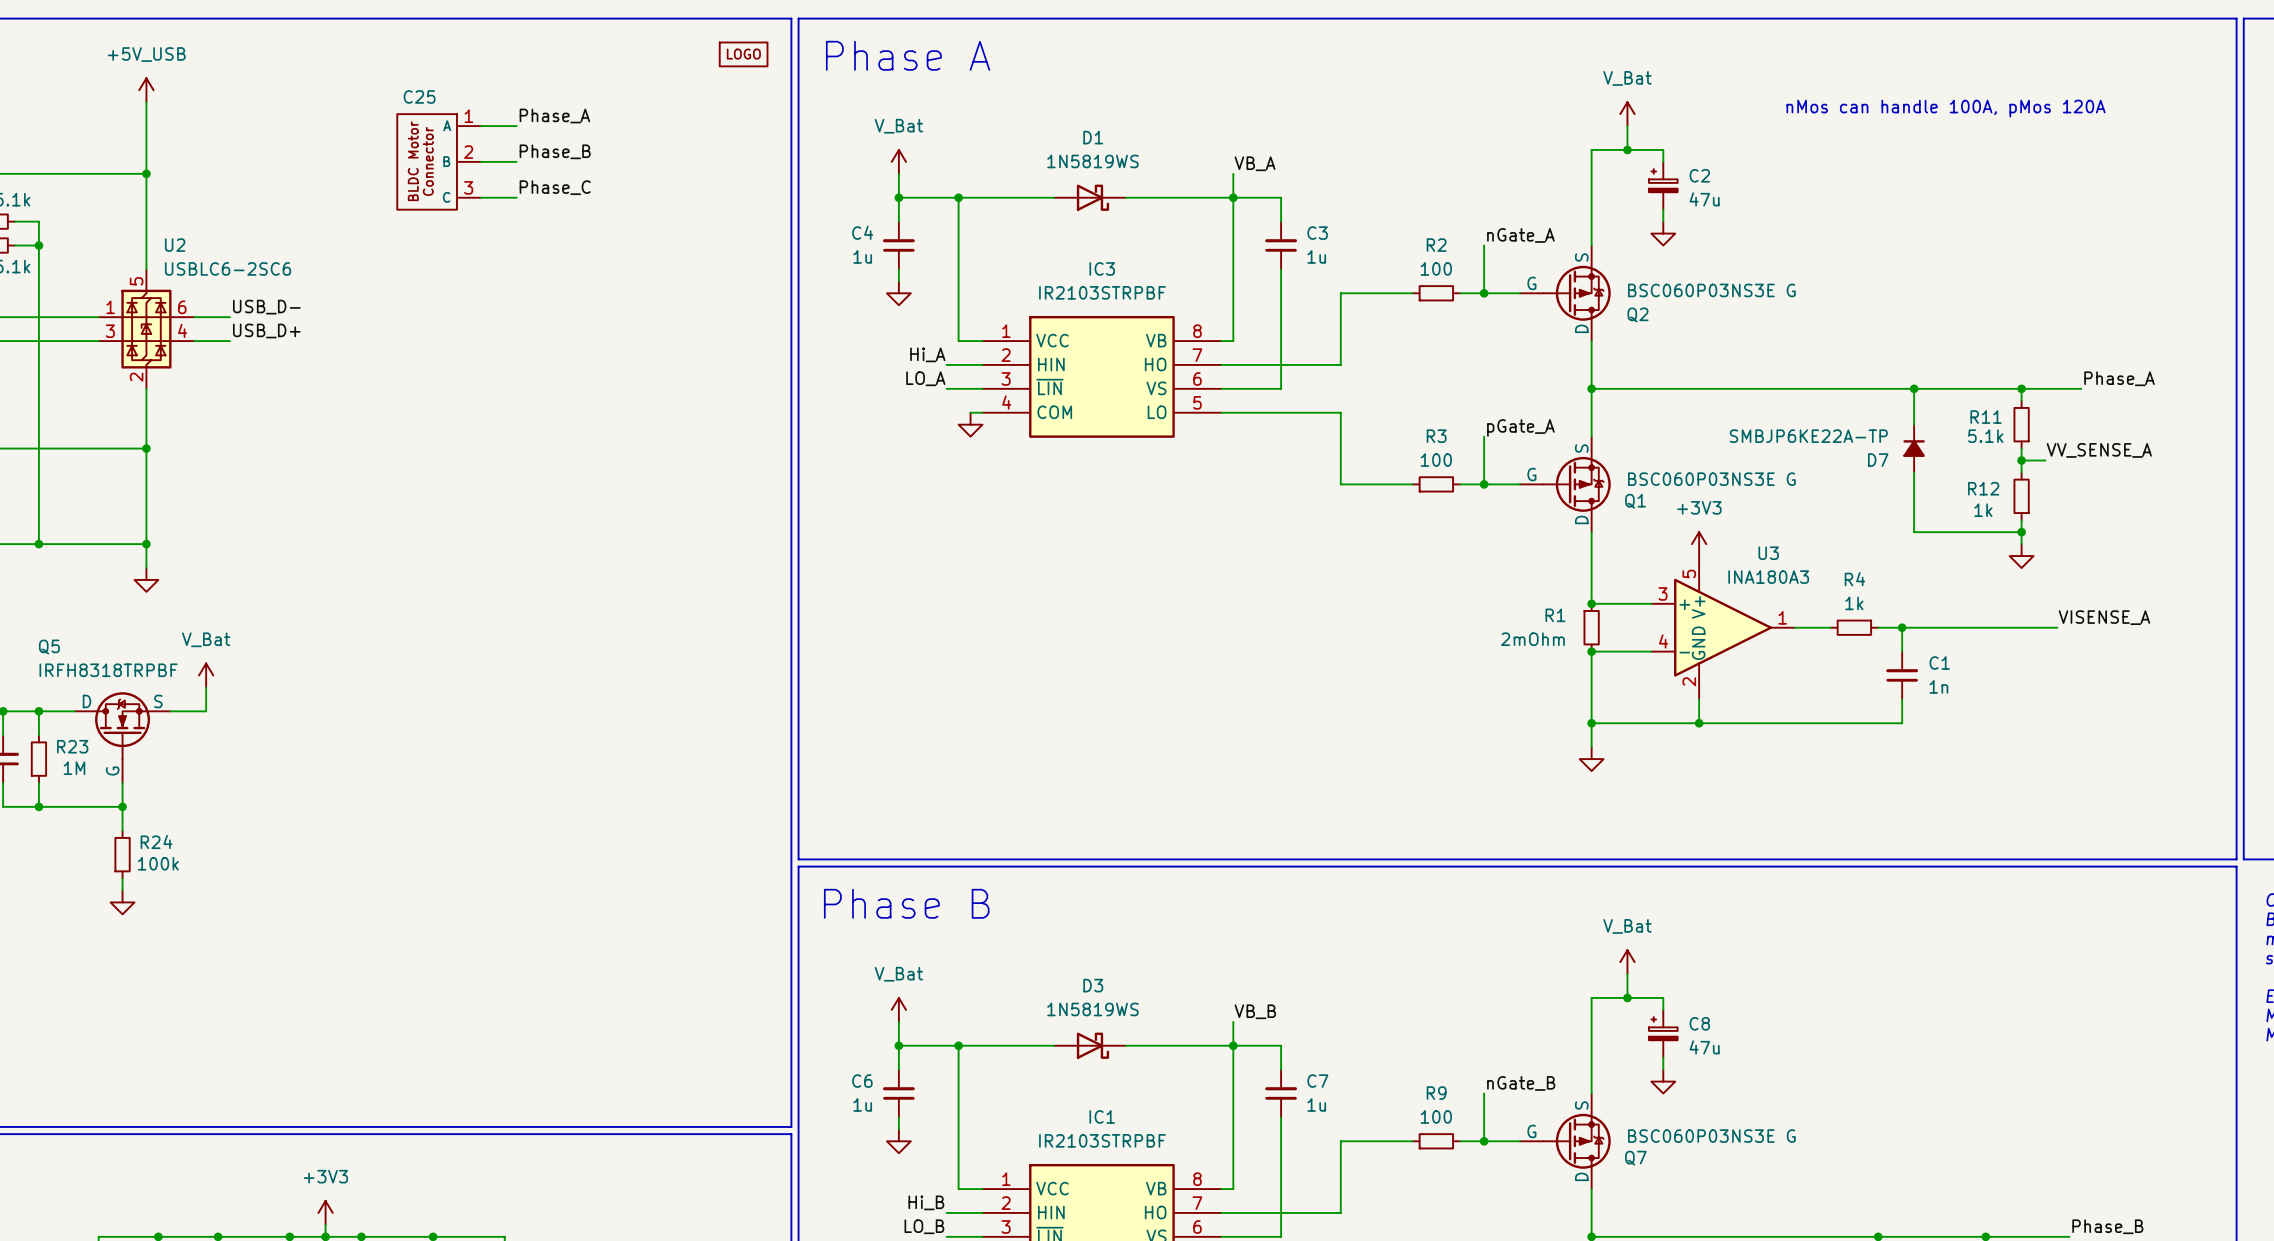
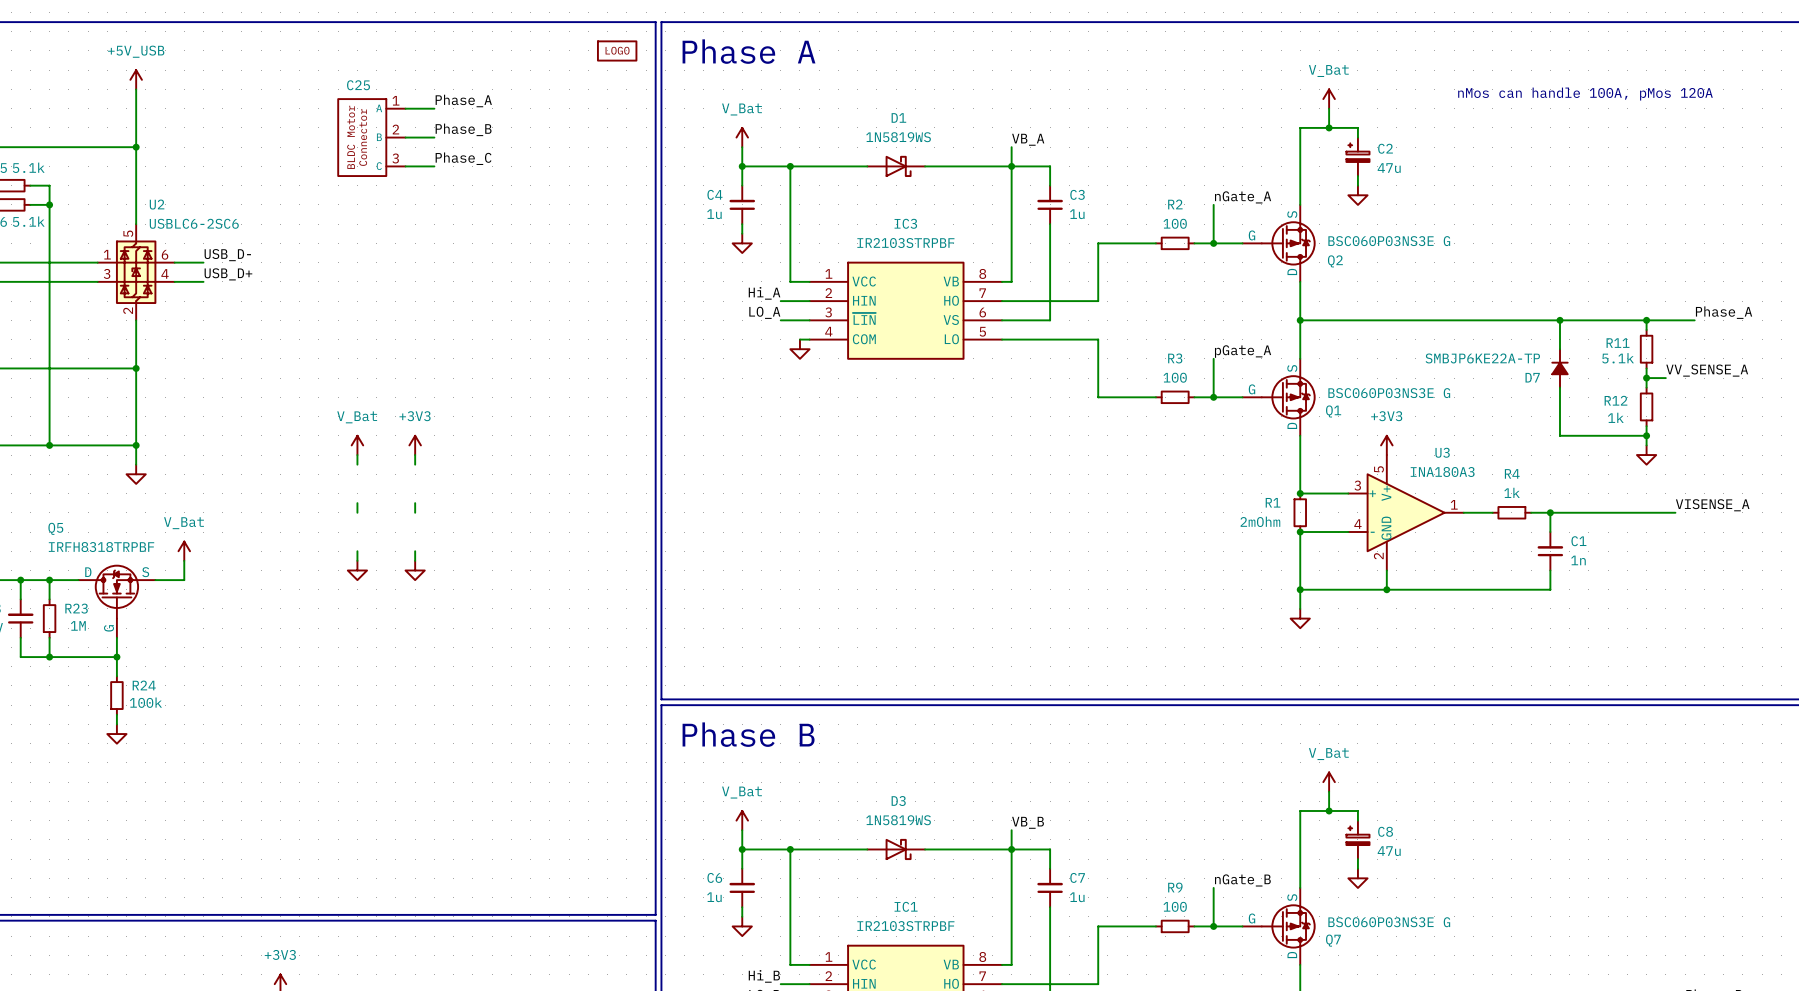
power symbol: none -> V_Bat (357, 445)
power symbol: none -> +3V3 (415, 445)
wire: none -> (357, 455) (357, 464)
wire: none -> (415, 455) (415, 464)
wire: none -> (357, 503) (357, 512)
wire: none -> (415, 503) (415, 512)
wire: none -> (357, 551) (357, 560)
wire: none -> (415, 551) (415, 560)
power symbol: none -> (357, 570)
power symbol: none -> (415, 570)

